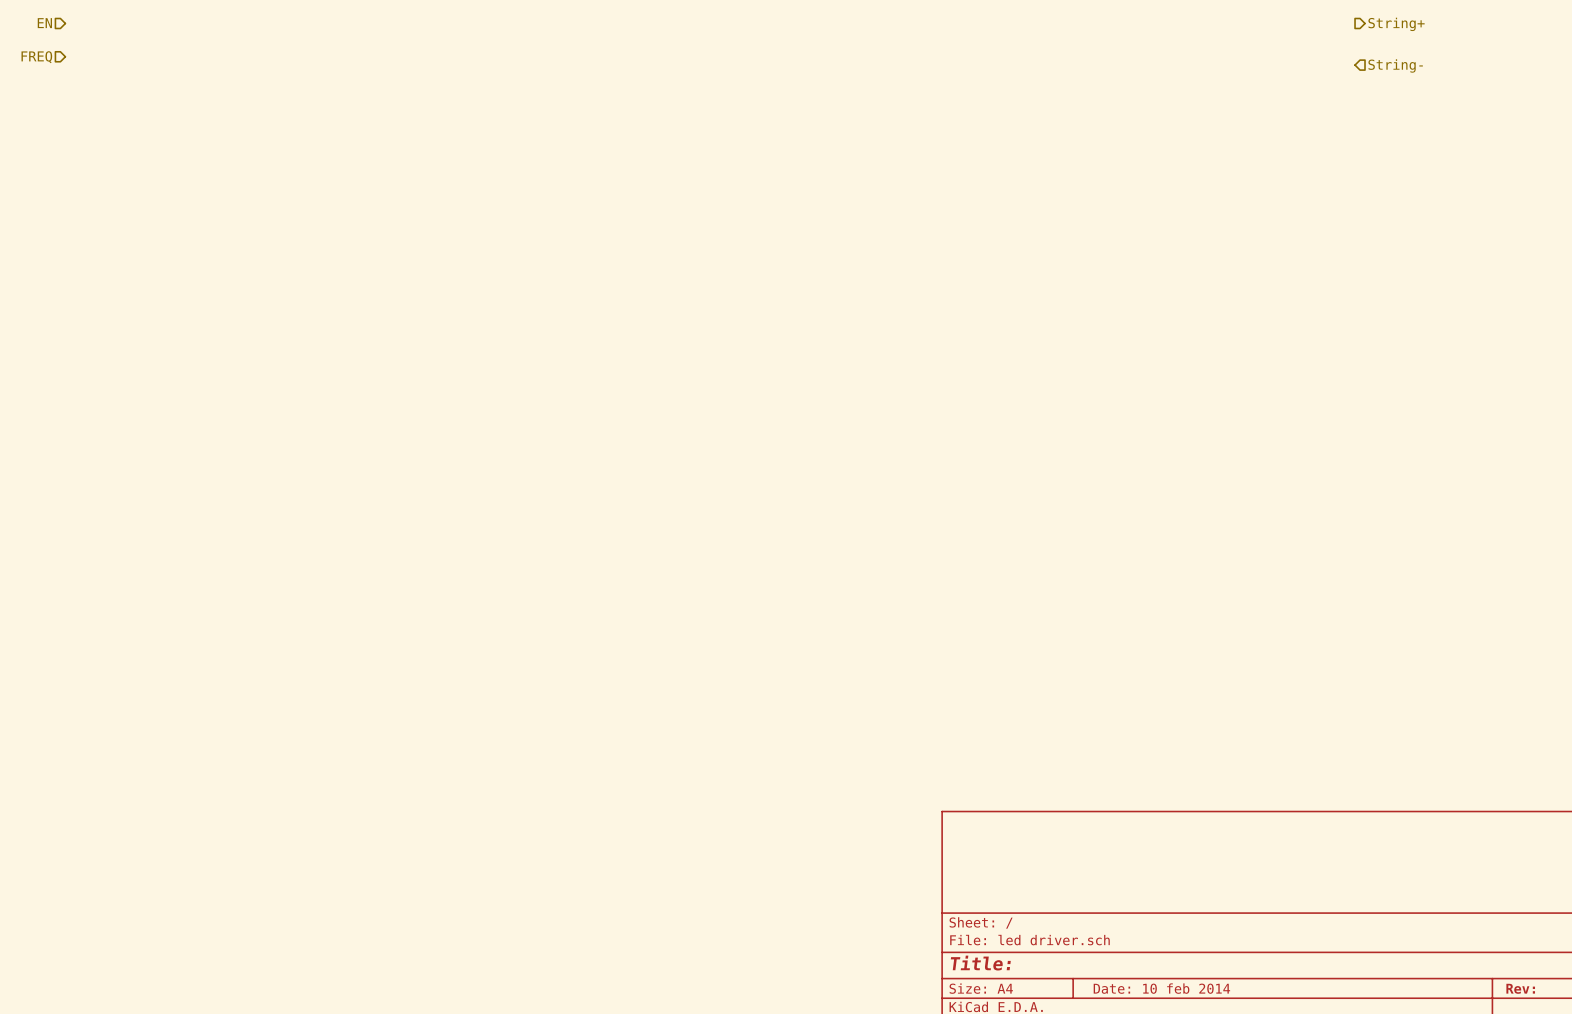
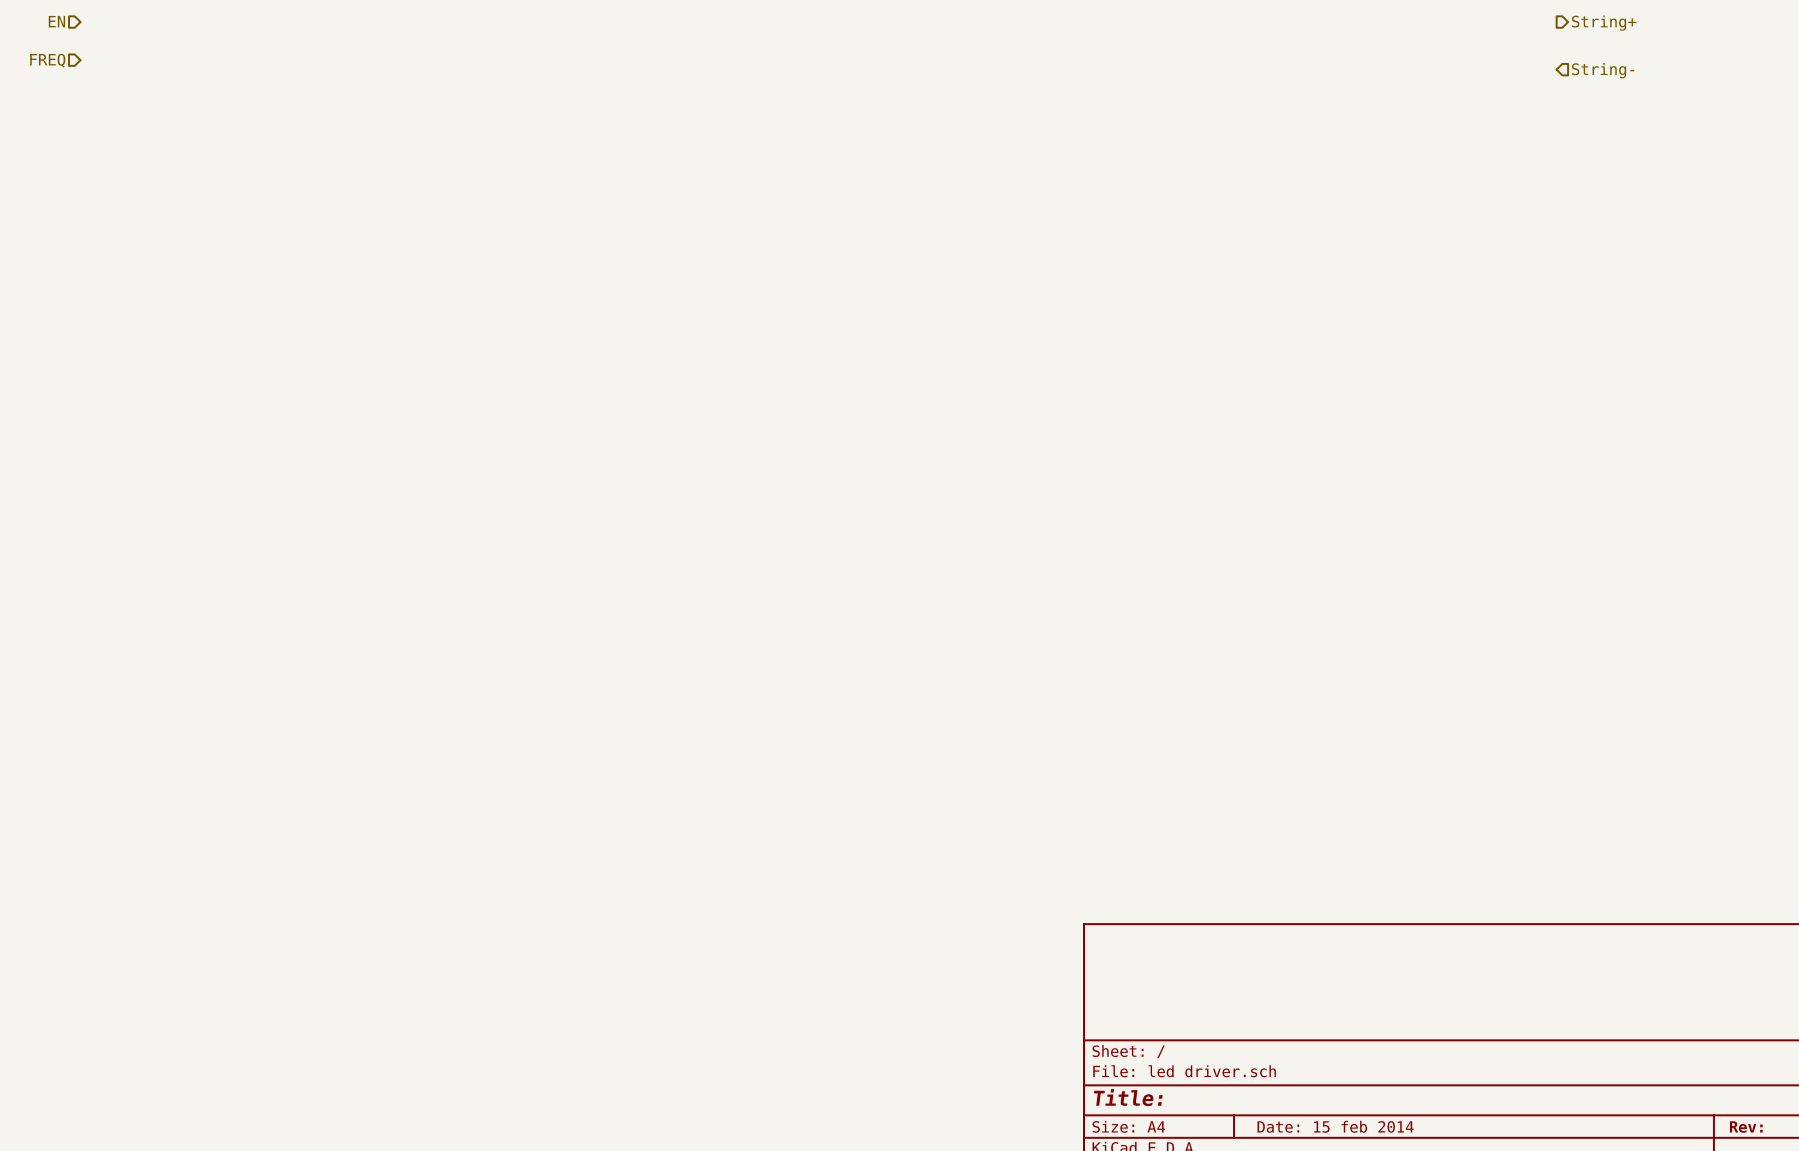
title block: Date: 10 feb 2014 (1161, 988) -> Date: 15 feb 2014 (1335, 1126)

